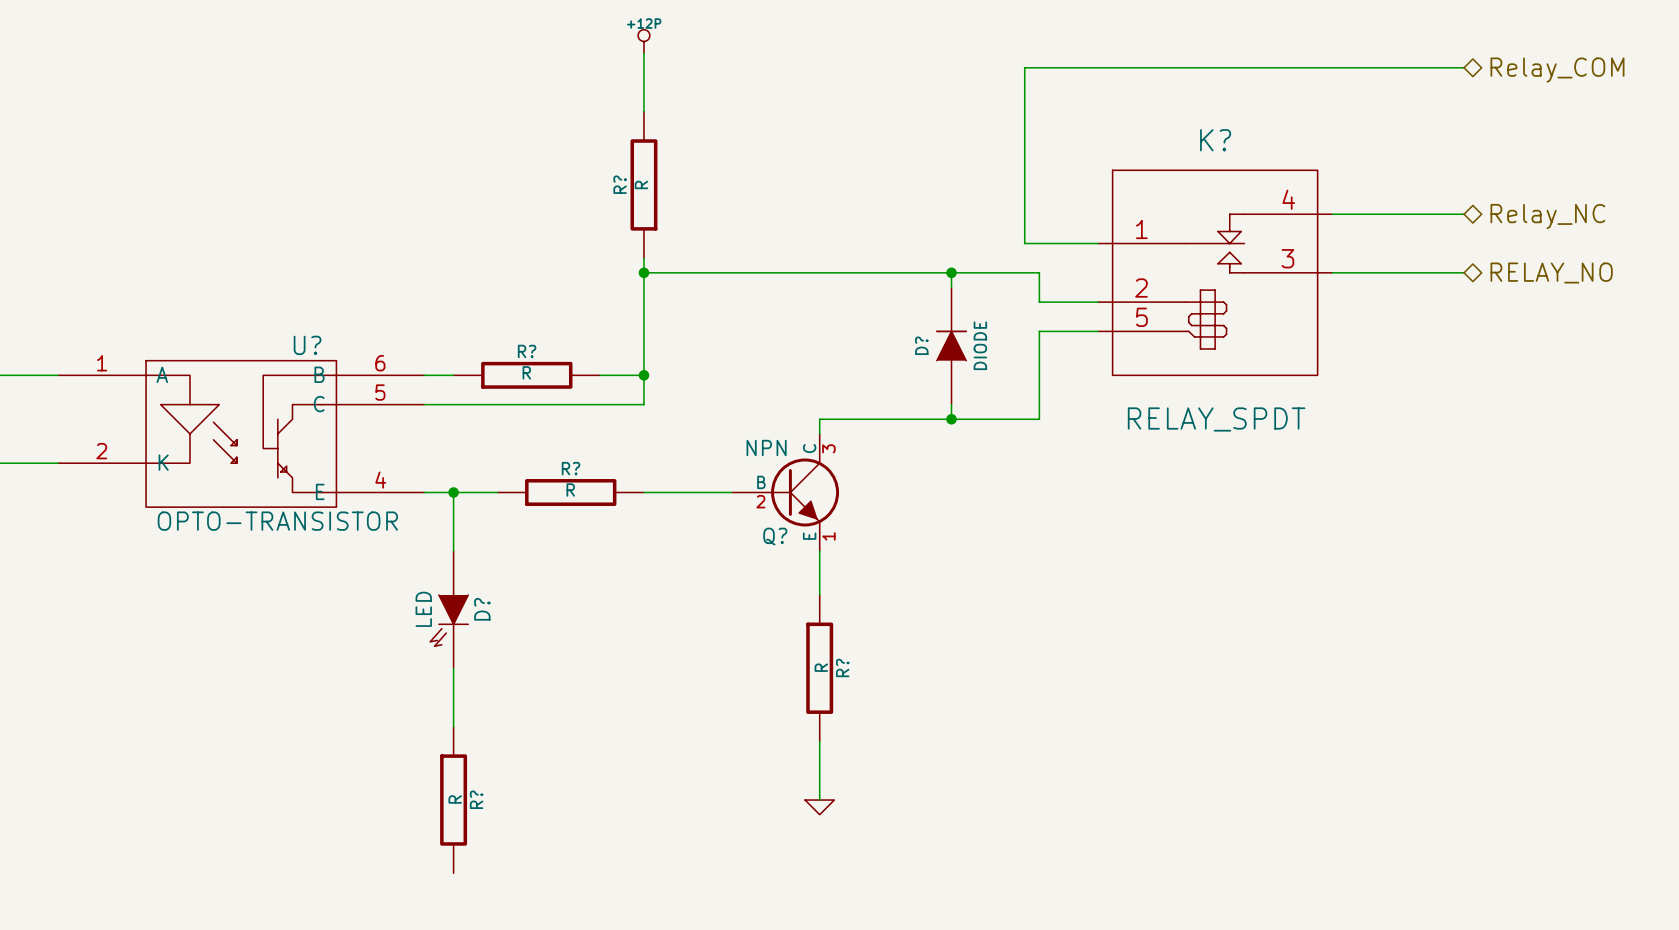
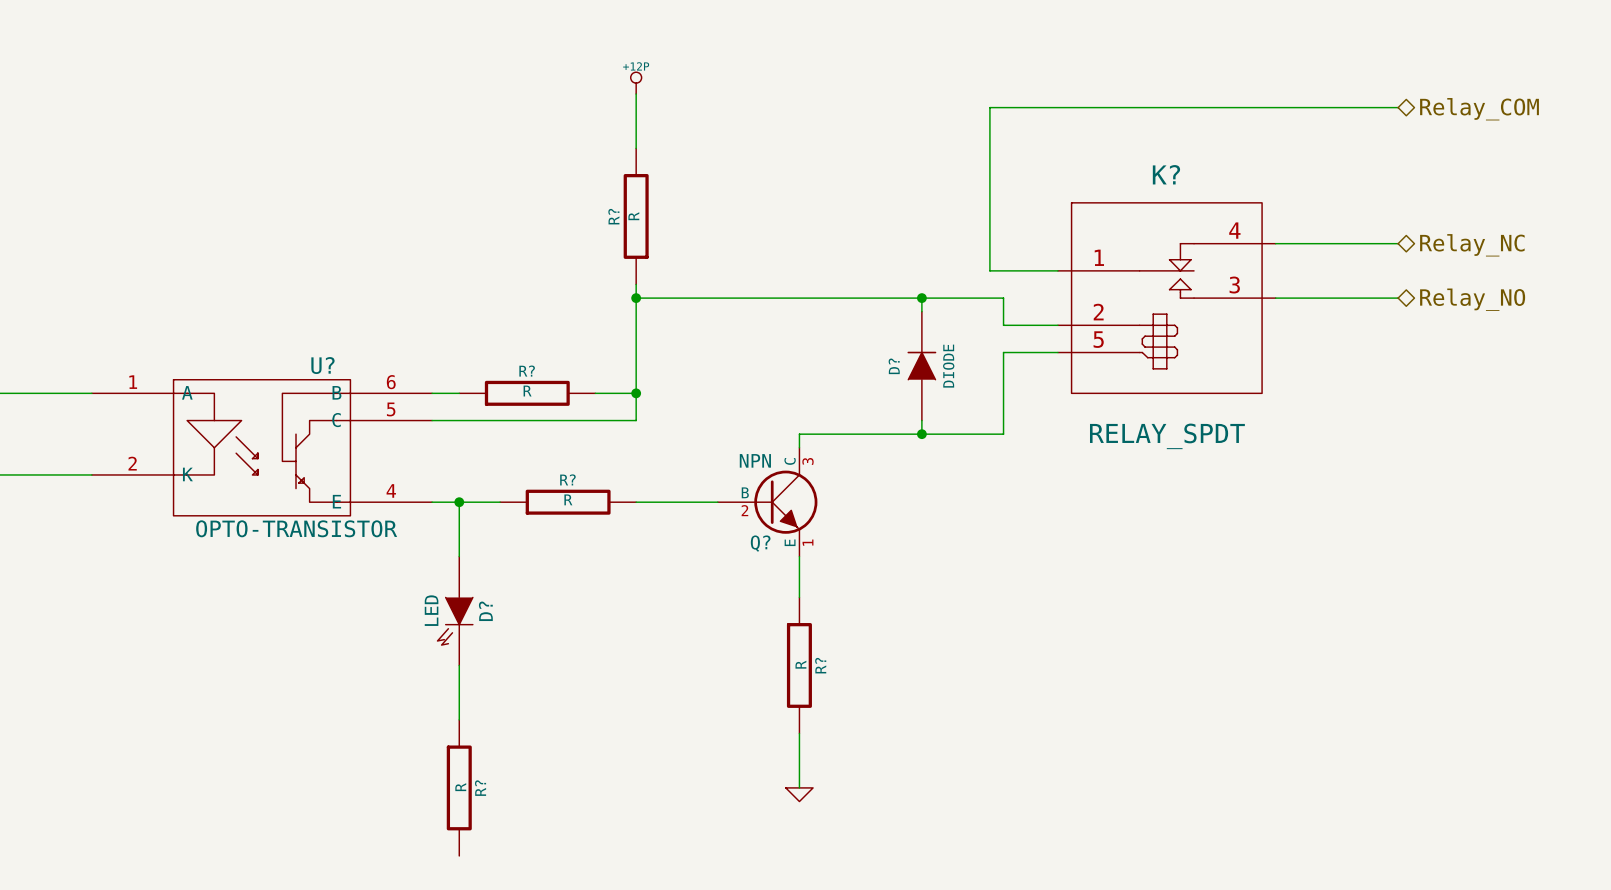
hierarchical label: RELAY_NO (1551, 273) -> Relay_NO (1472, 299)

